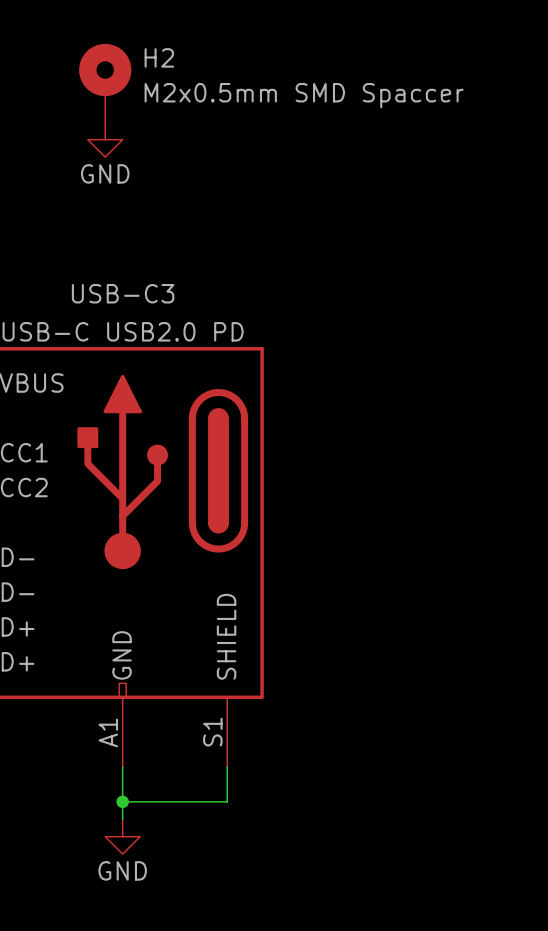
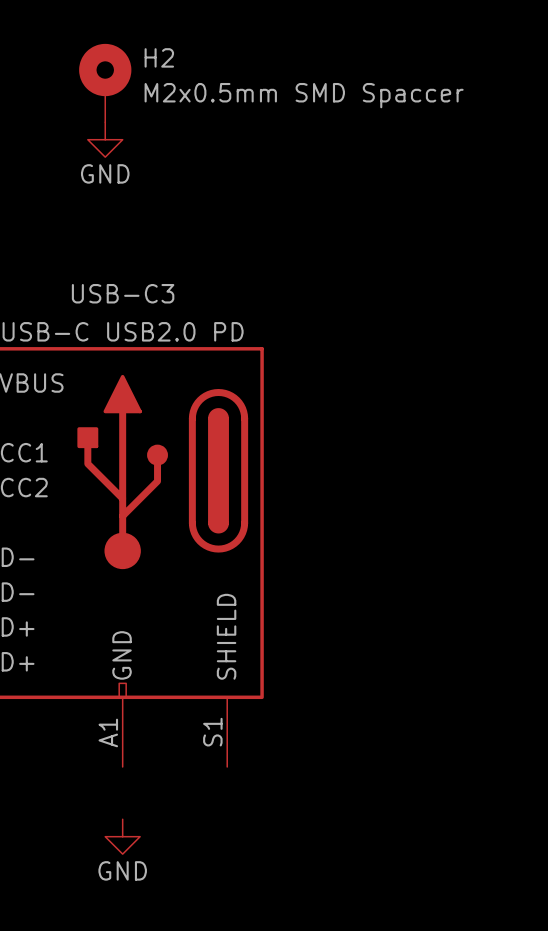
wire: (122, 766) (122, 819) -> none
wire: (227, 766) (227, 801) (122, 801) -> none
junction: (122, 801) -> none

